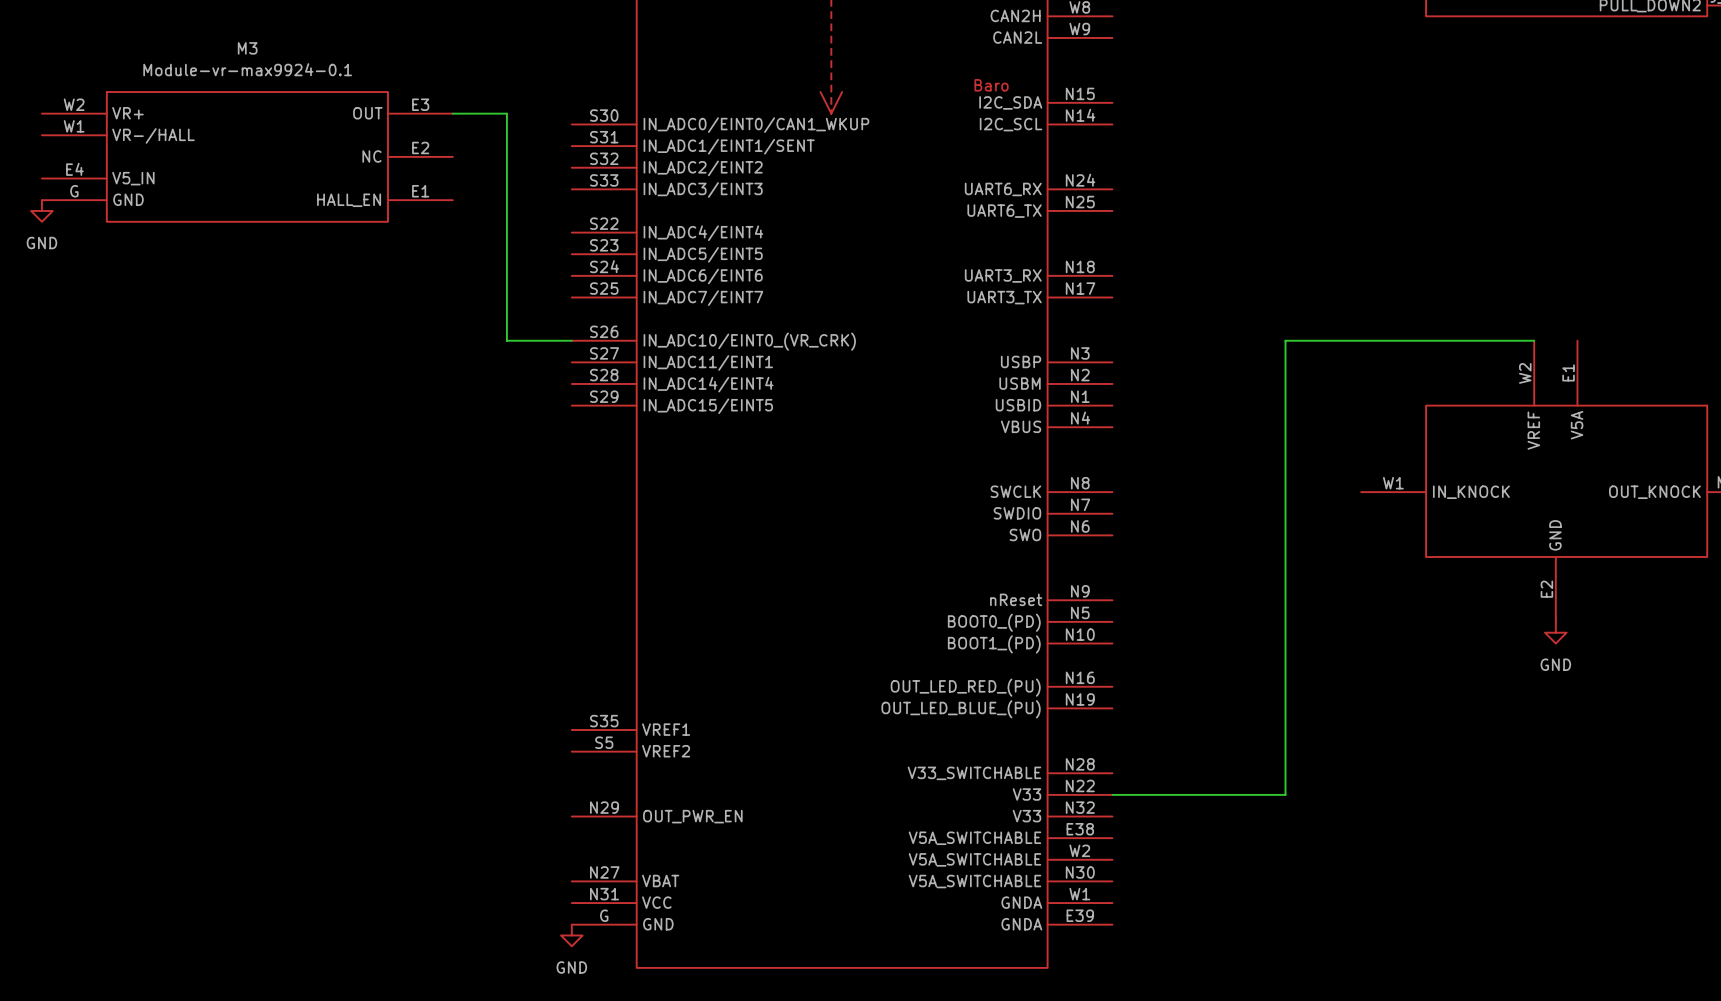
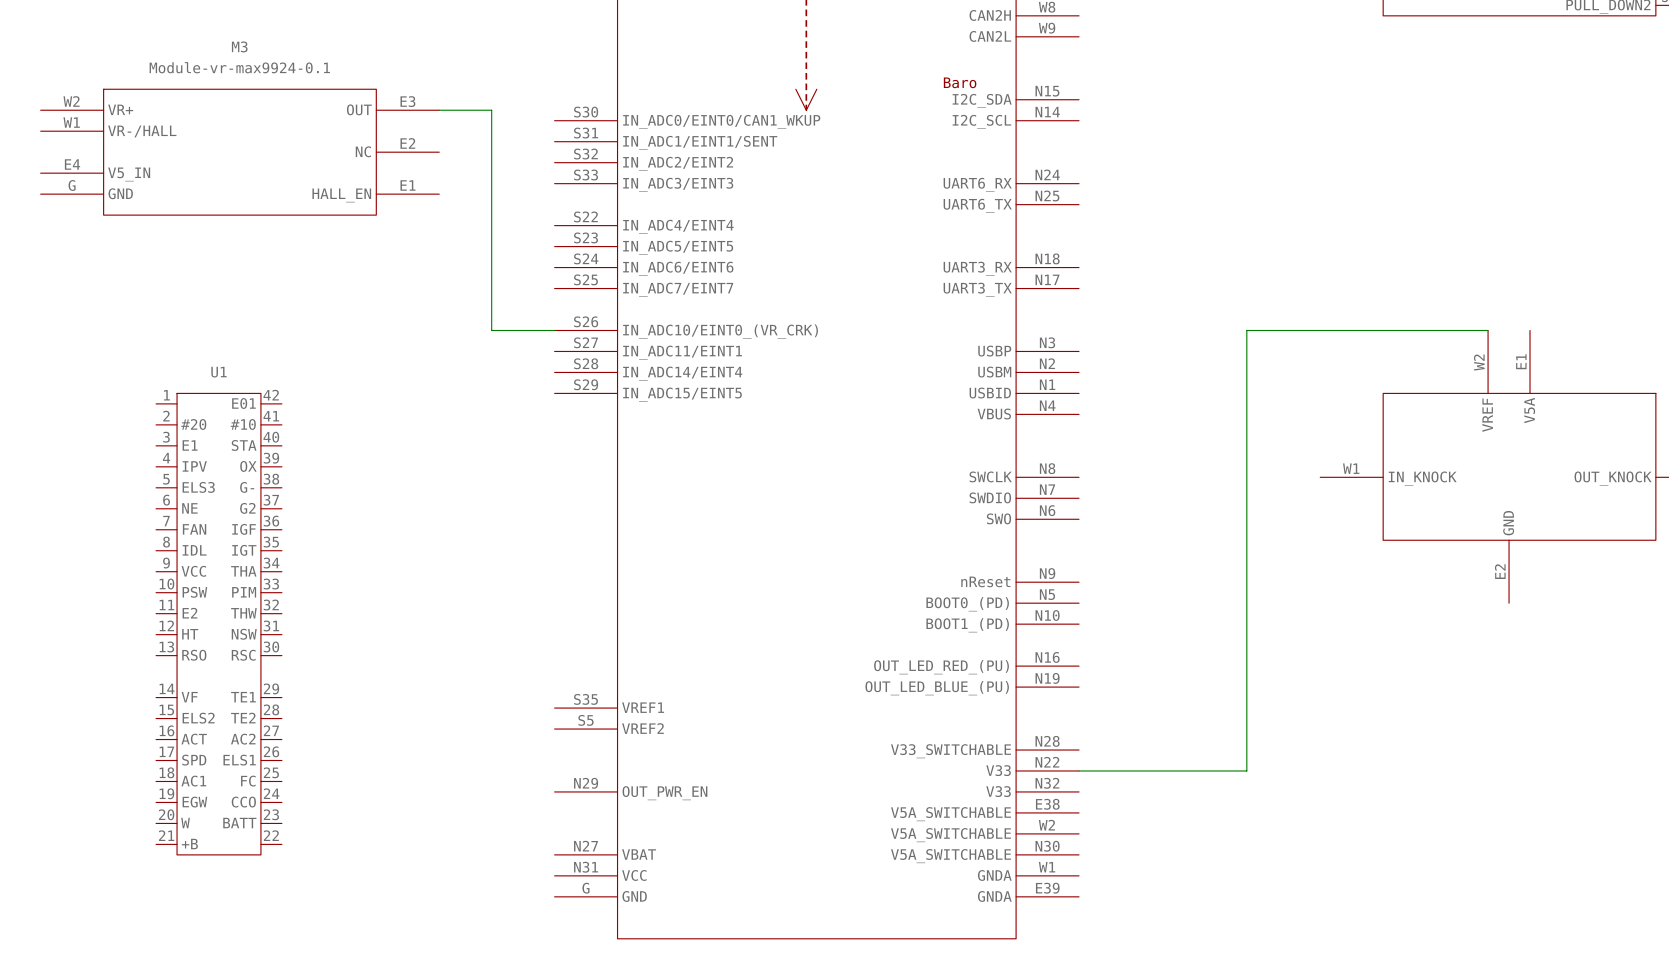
power symbol: GND (41, 210) -> none
power symbol: GND (1555, 632) -> none
U1: none -> (218, 624)
power symbol: GND (571, 935) -> none

